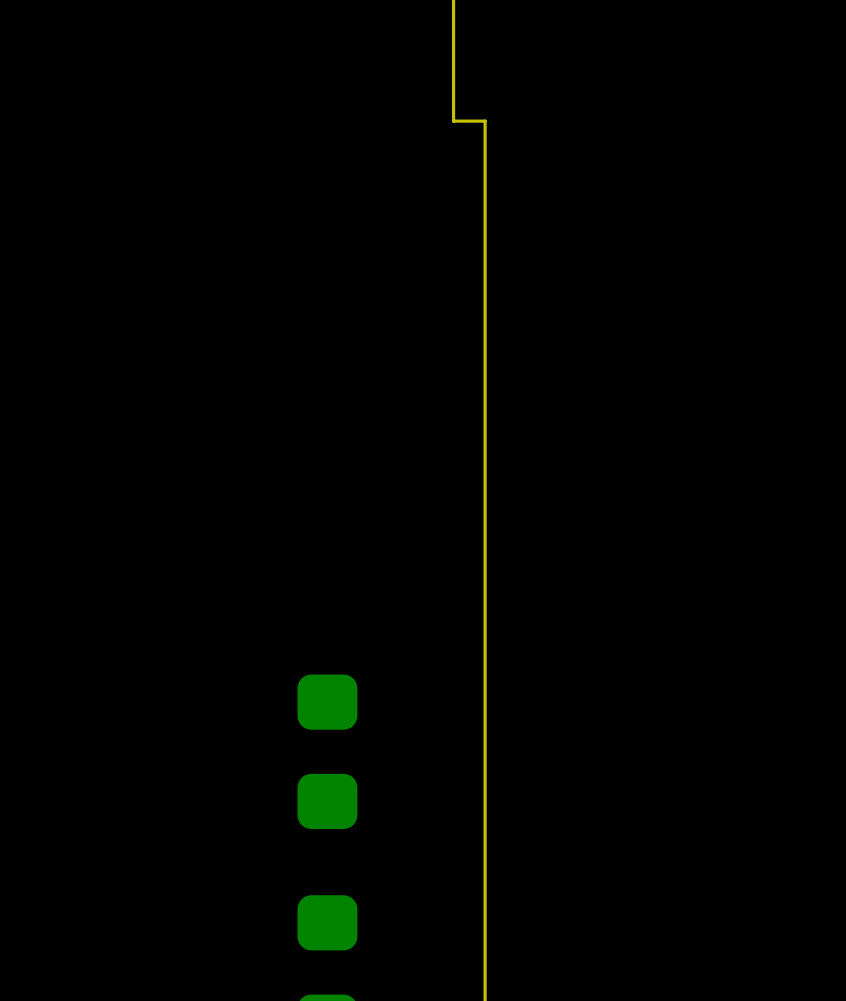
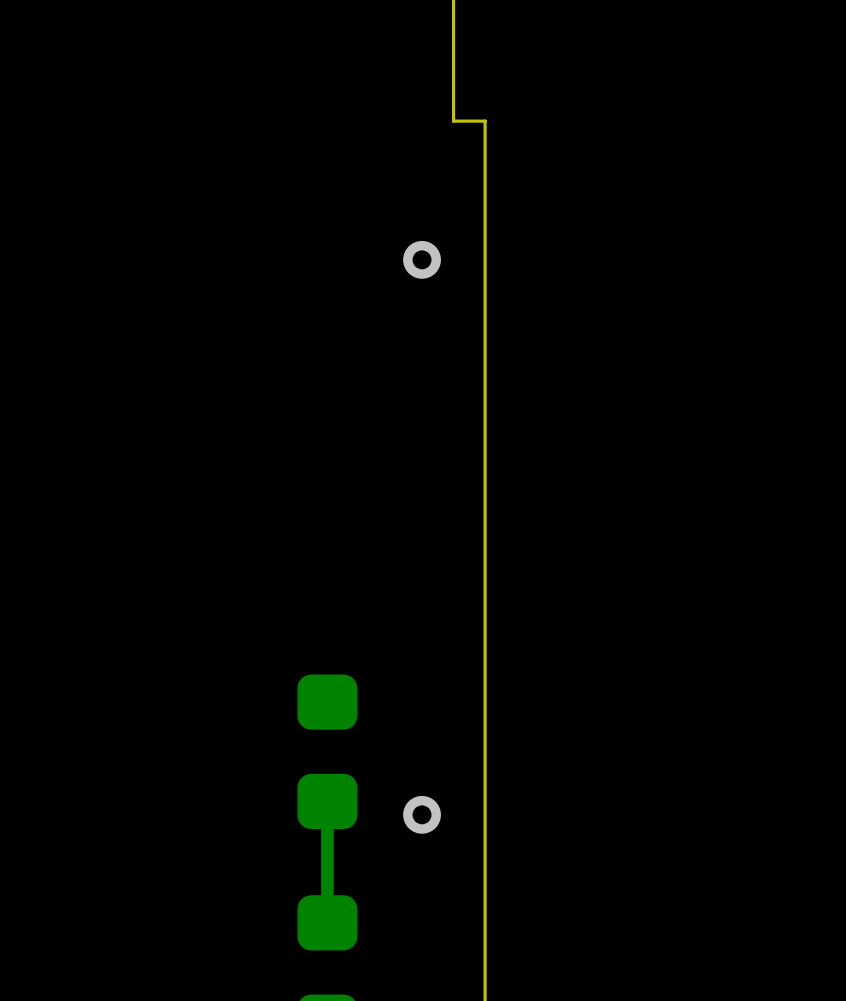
via: none -> (422, 259)
bottom track: none -> (327, 801) (327, 922)
via: none -> (422, 814)

